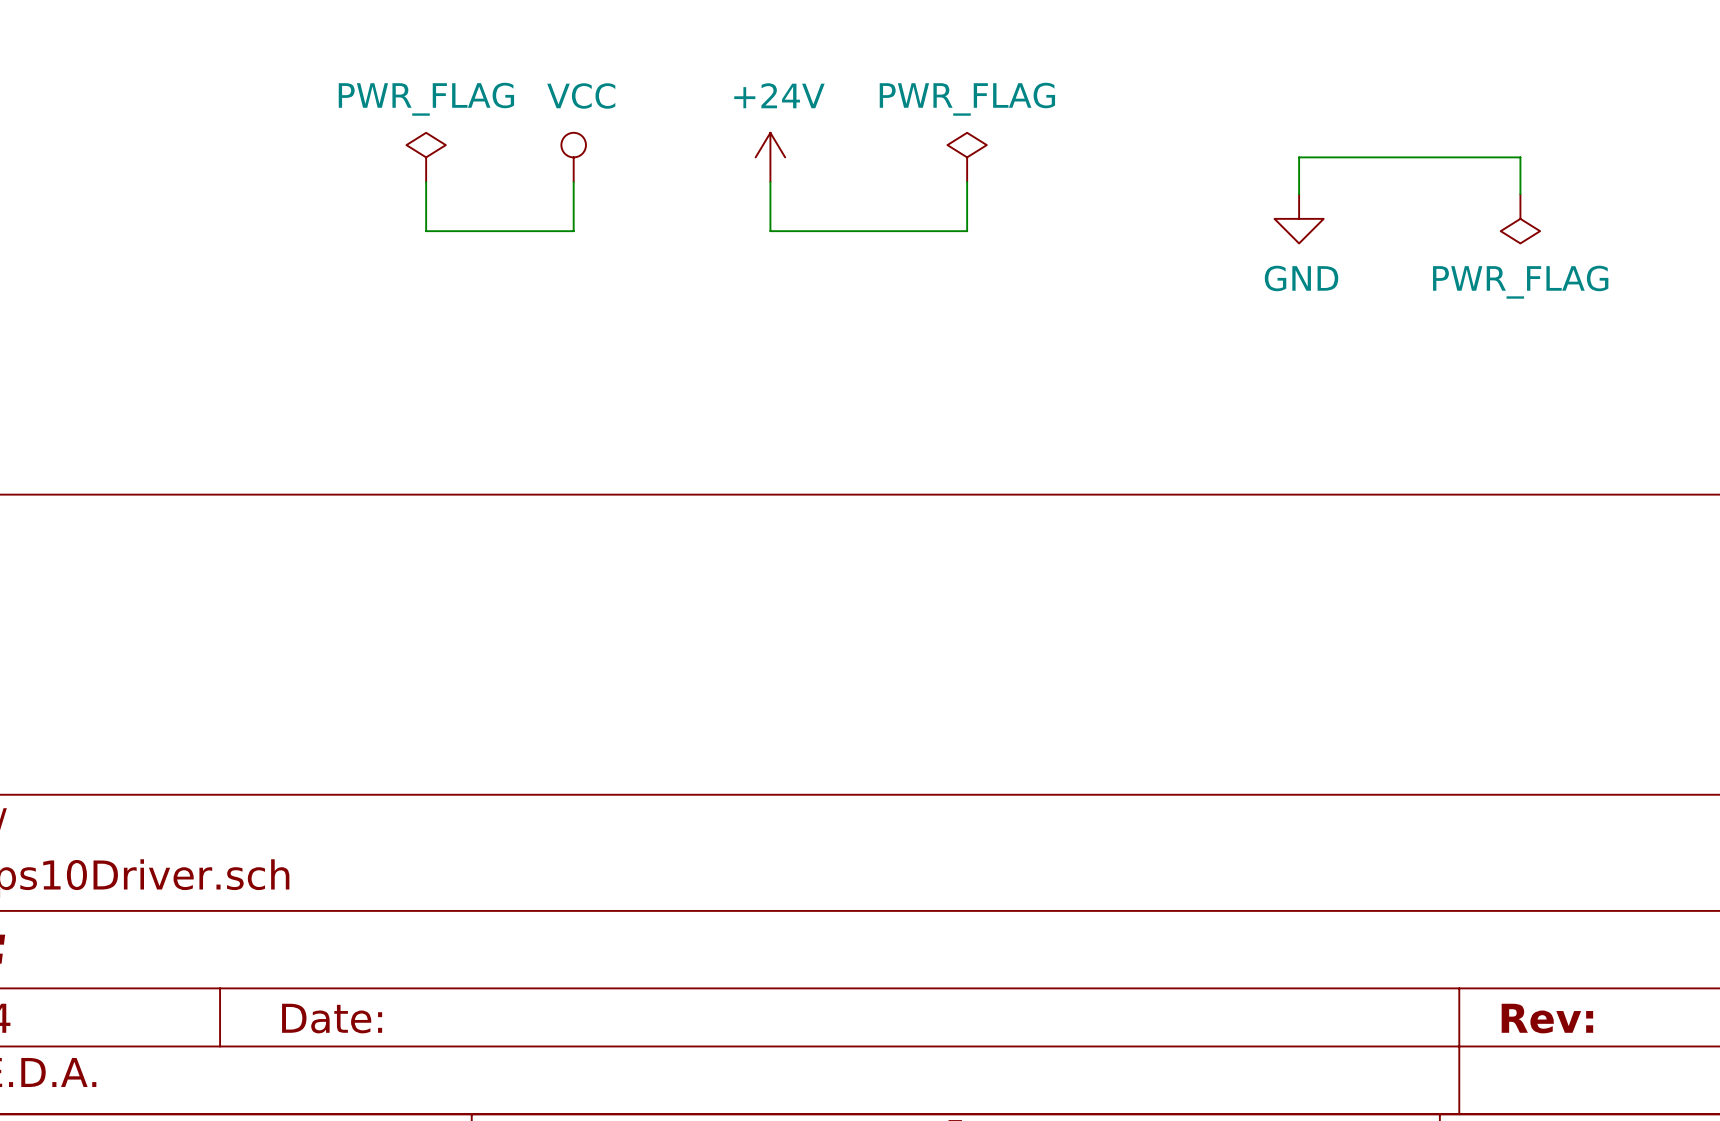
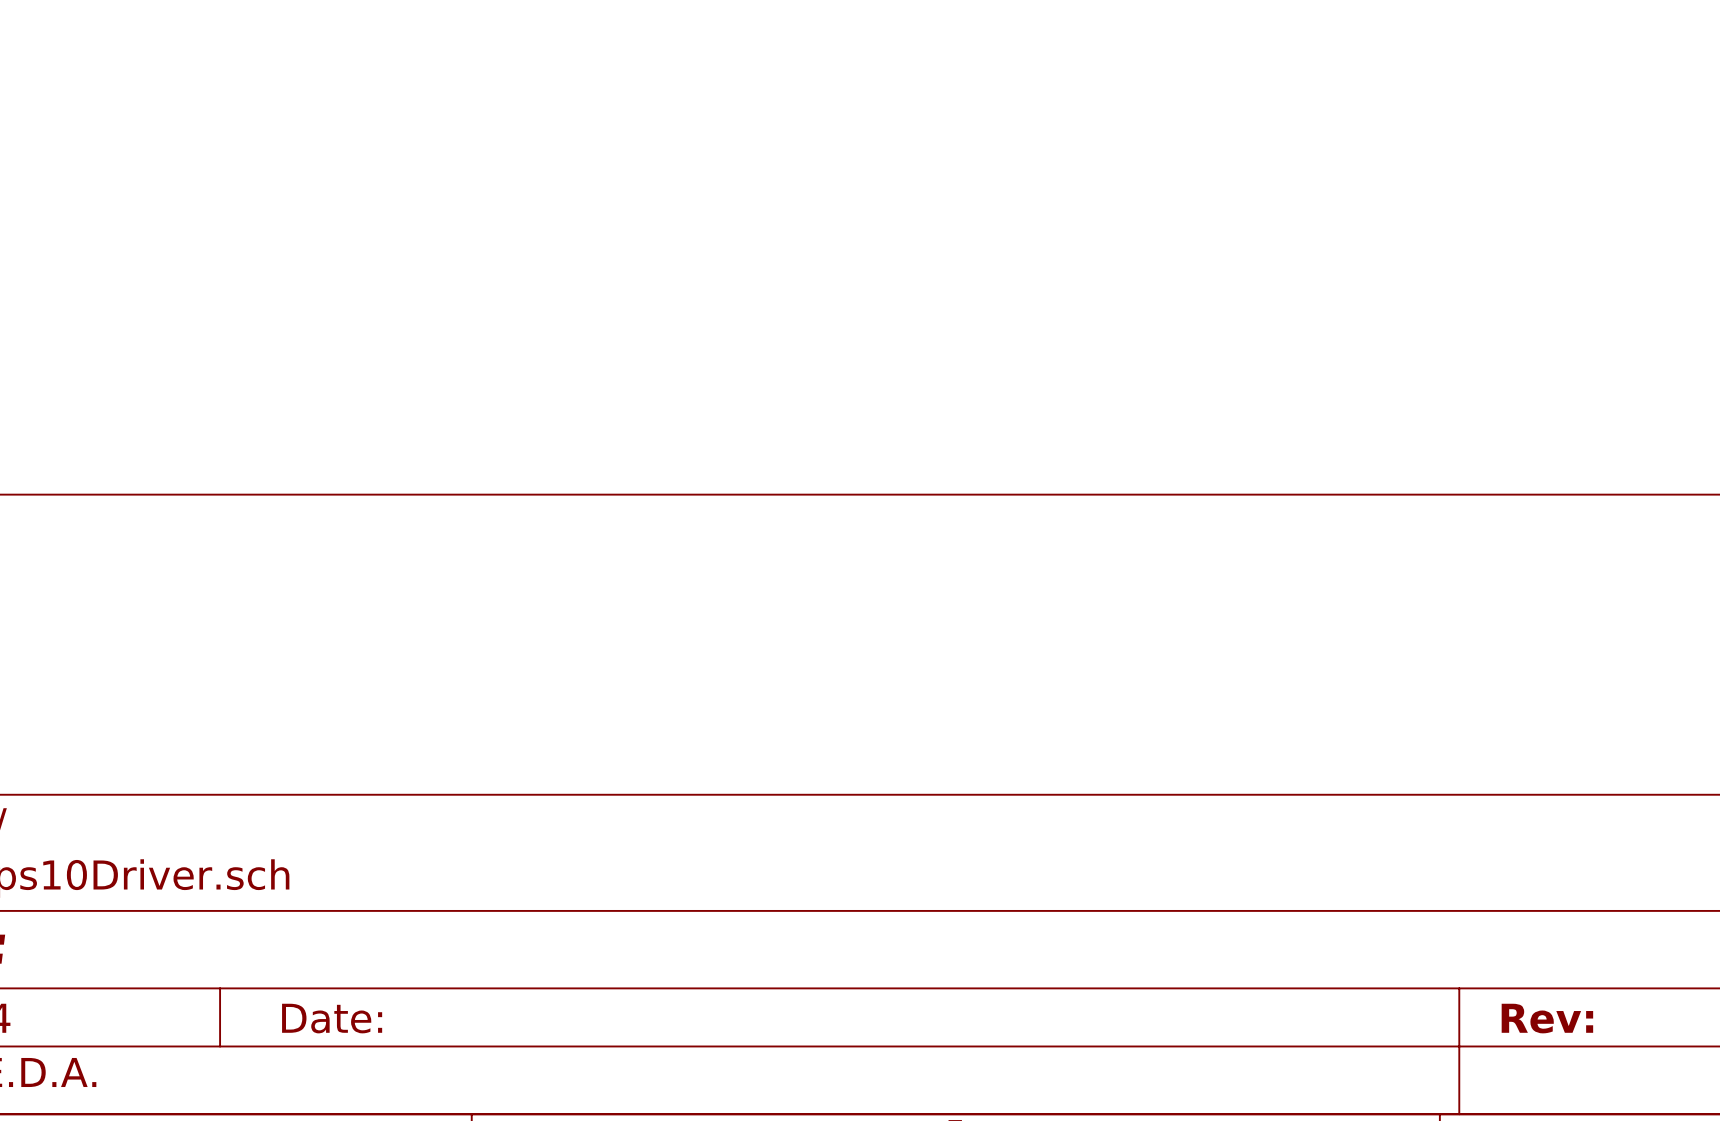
power symbol: PWR_FLAG (426, 157) -> none
power symbol: VCC (573, 157) -> none
power symbol: +24V (770, 157) -> none
power symbol: PWR_FLAG (967, 157) -> none
wire: (426, 181) (426, 231) (573, 231) (573, 181) -> none
wire: (770, 181) (770, 231) (967, 231) (967, 181) -> none
wire: (1299, 194) (1299, 157) (1520, 157) (1520, 194) -> none
power symbol: GND (1299, 218) -> none
power symbol: PWR_FLAG (1520, 218) -> none

